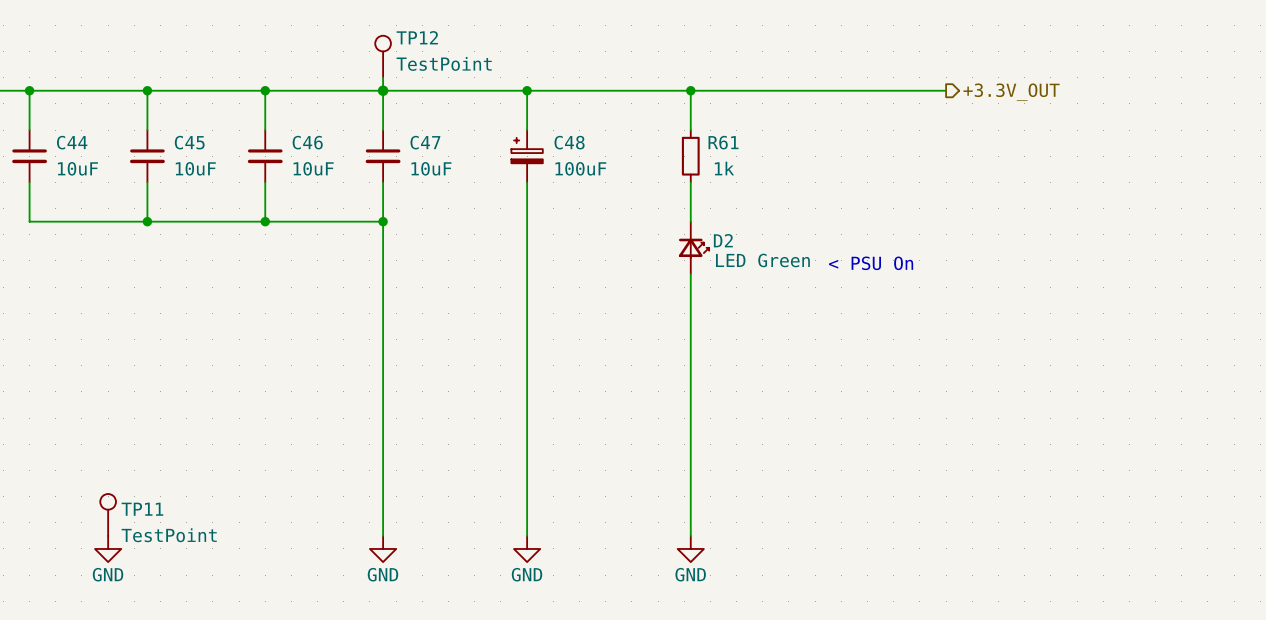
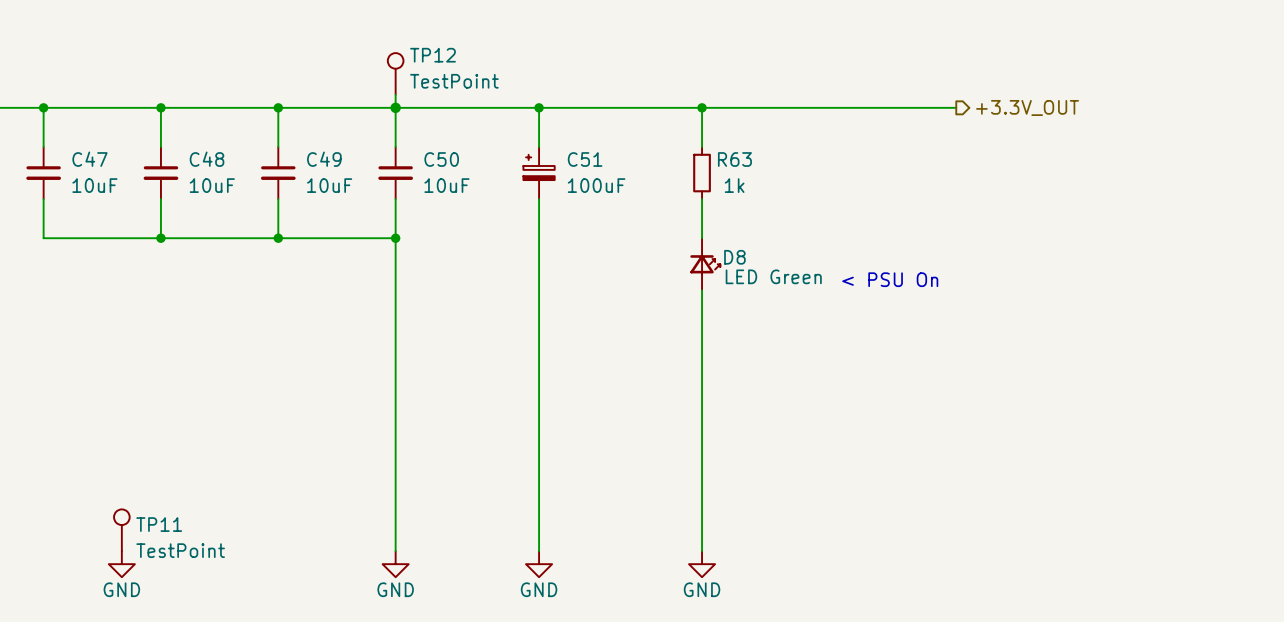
C44 name: C44 (72, 142) -> C47 (89, 159)
C45 name: C45 (189, 142) -> C48 (207, 159)
C46 name: C46 (307, 142) -> C49 (324, 159)
C47 name: C47 (425, 142) -> C50 (441, 159)
C48 name: C48 (569, 142) -> C51 (585, 159)
R61 name: R61 (723, 142) -> R63 (734, 159)
D2 name: D2 (723, 240) -> D8 (734, 257)

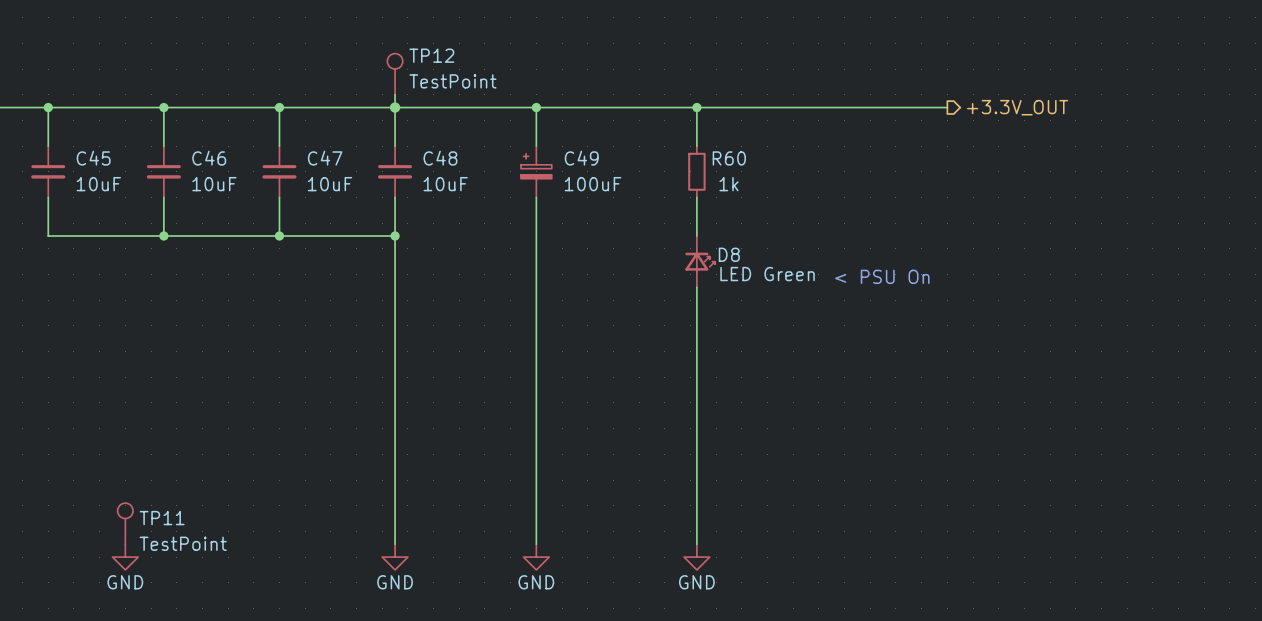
C47 name: C47 (89, 159) -> C45 (93, 158)
C48 name: C48 (207, 159) -> C46 (209, 158)
C49 name: C49 (324, 159) -> C47 (325, 158)
C50 name: C50 (441, 159) -> C48 (440, 158)
C51 name: C51 (585, 159) -> C49 (581, 158)
R63 name: R63 (734, 159) -> R60 (729, 158)

